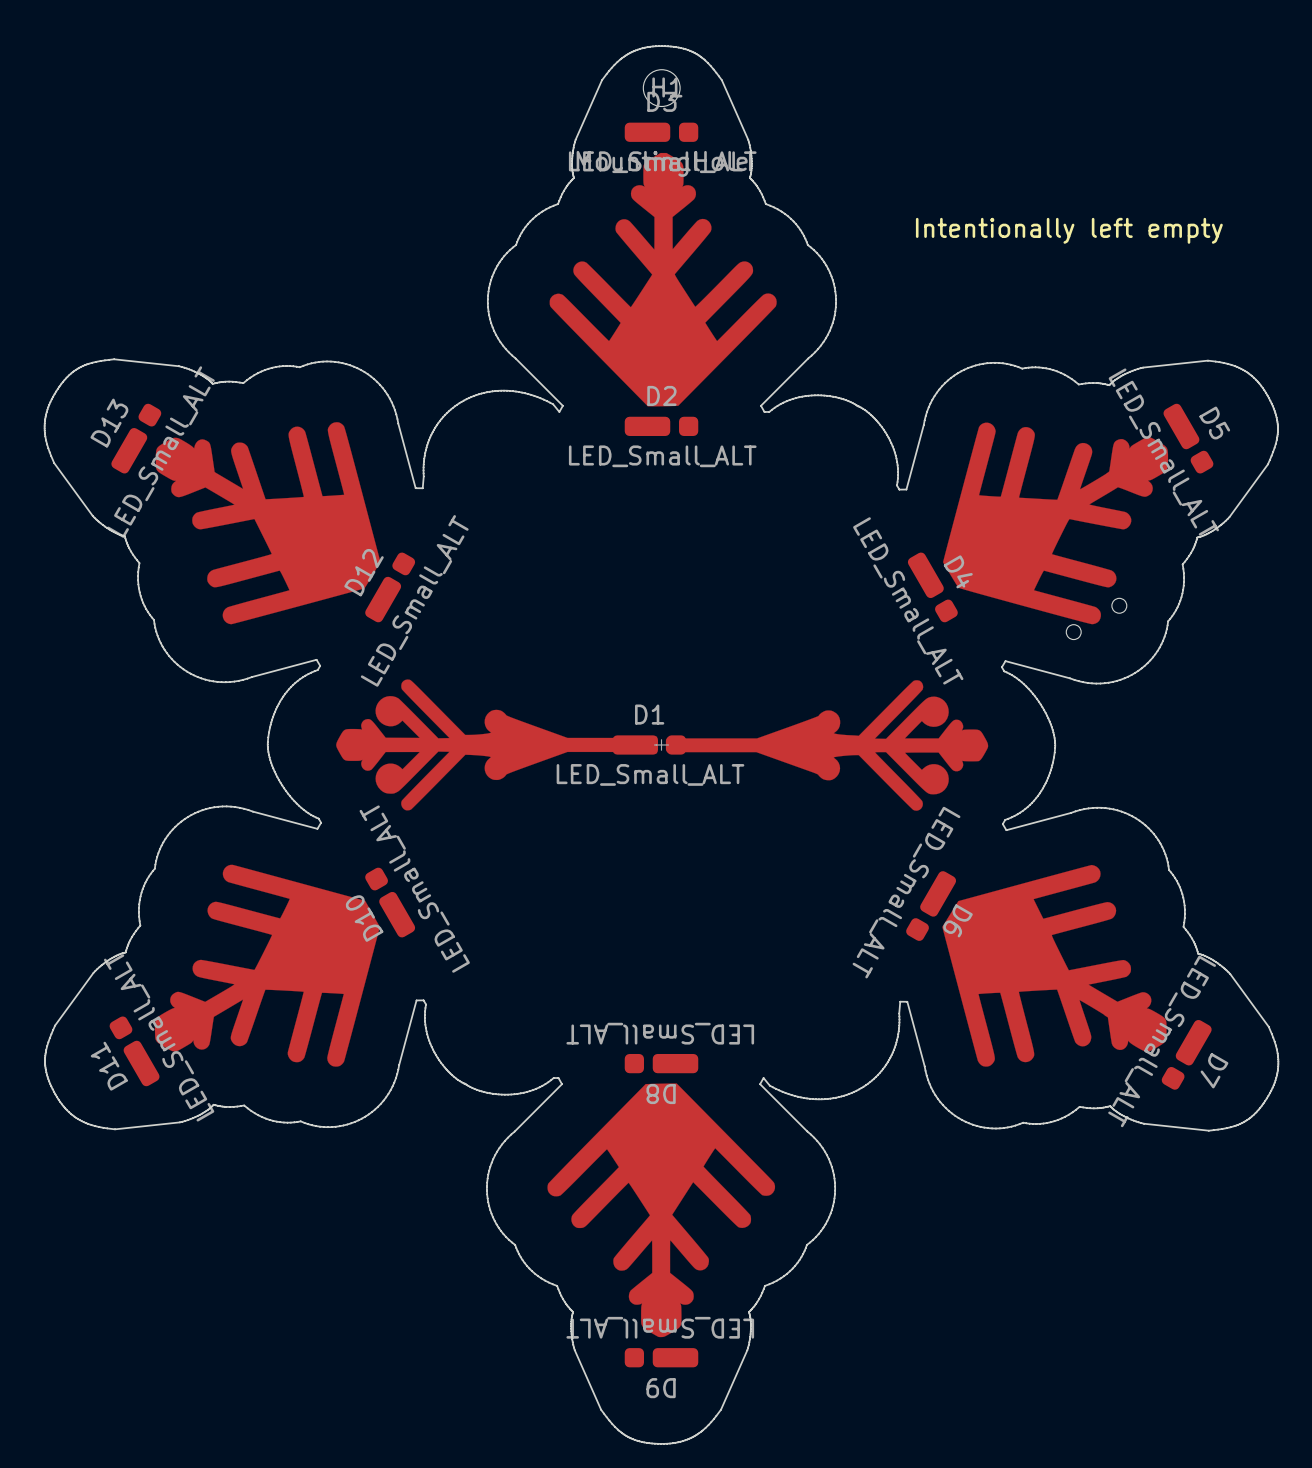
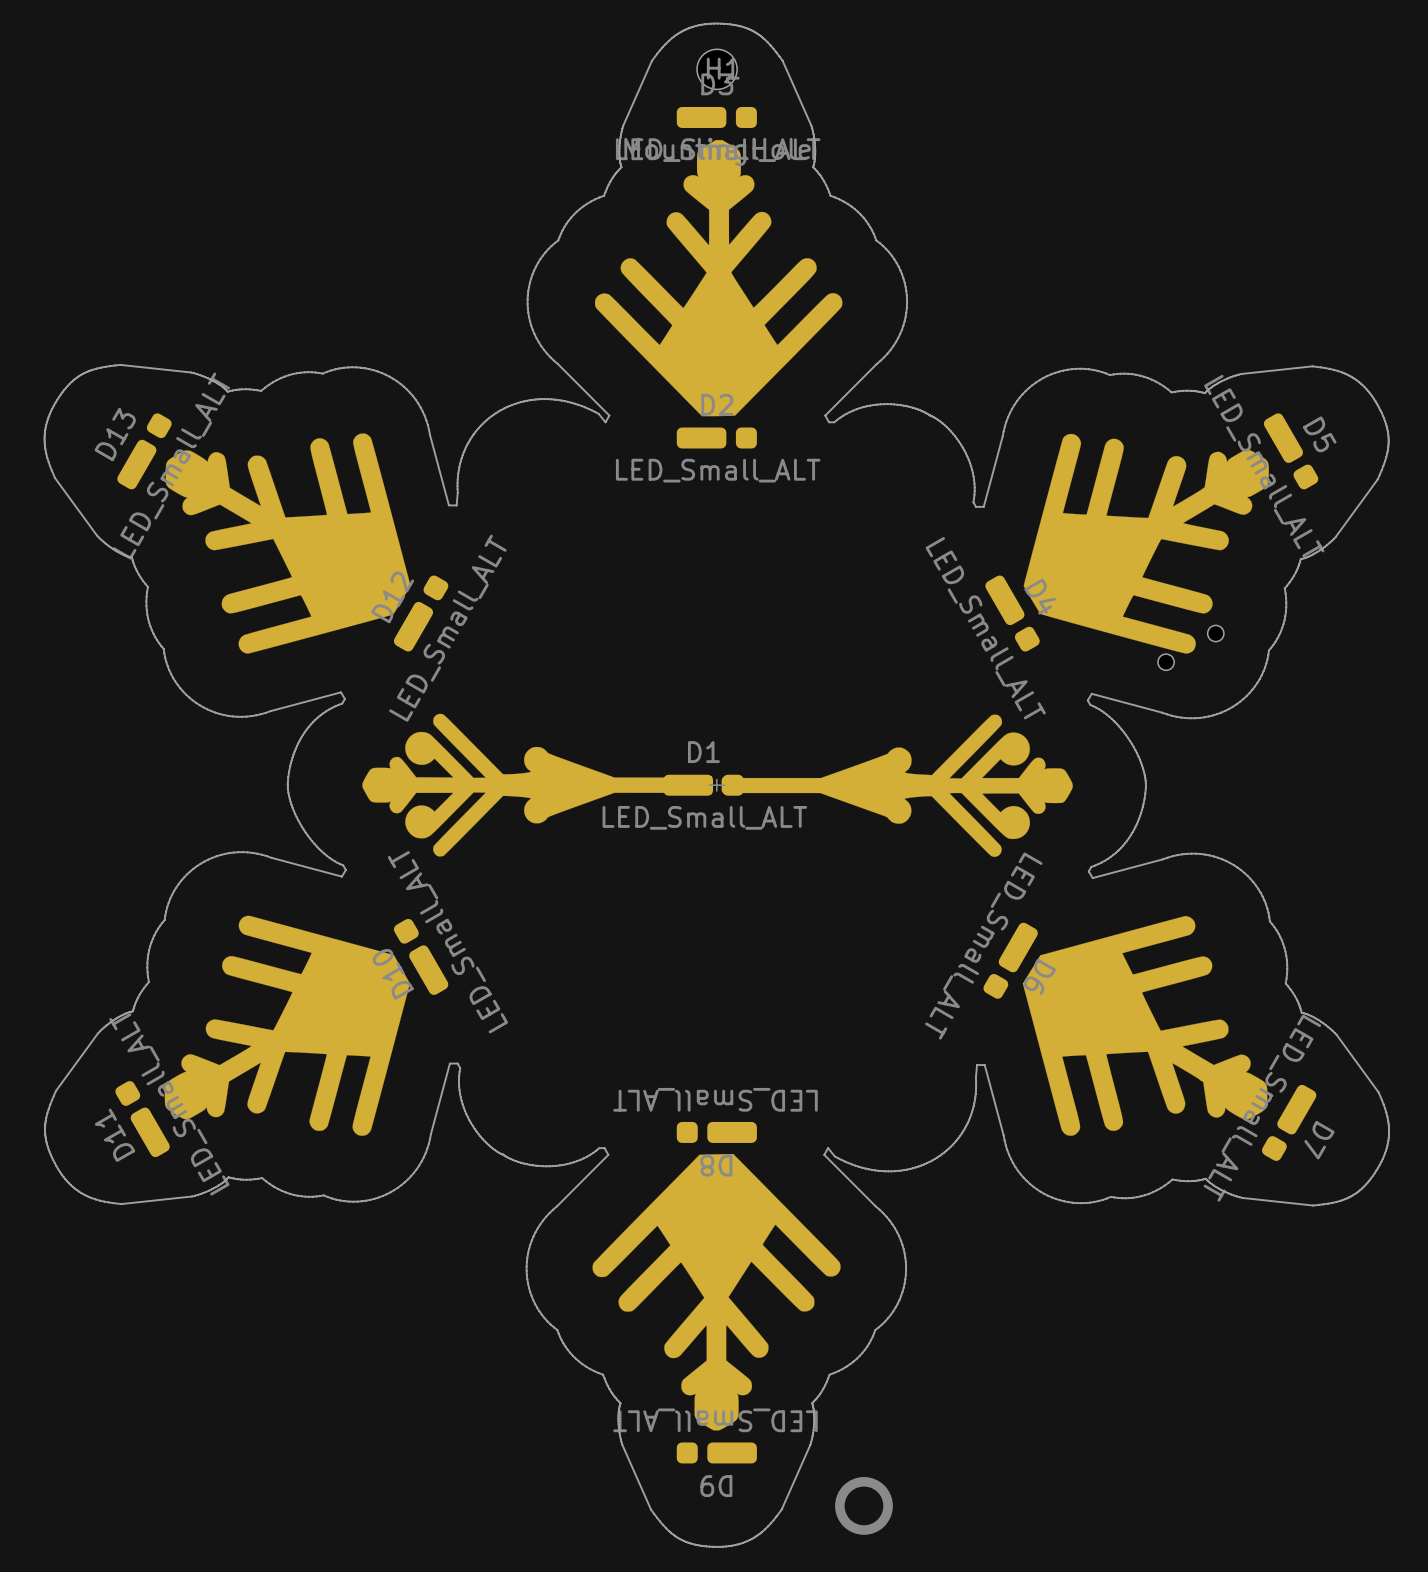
text: Intentionally left empty (1069, 230) -> none
drawing: none -> [835, 1477, 893, 1535]

